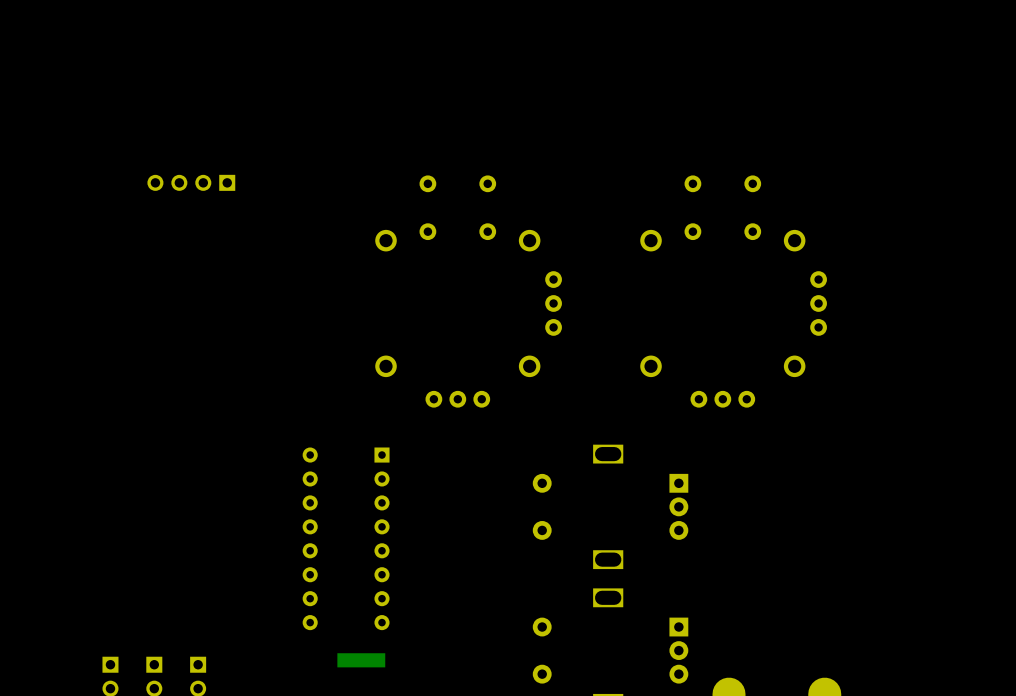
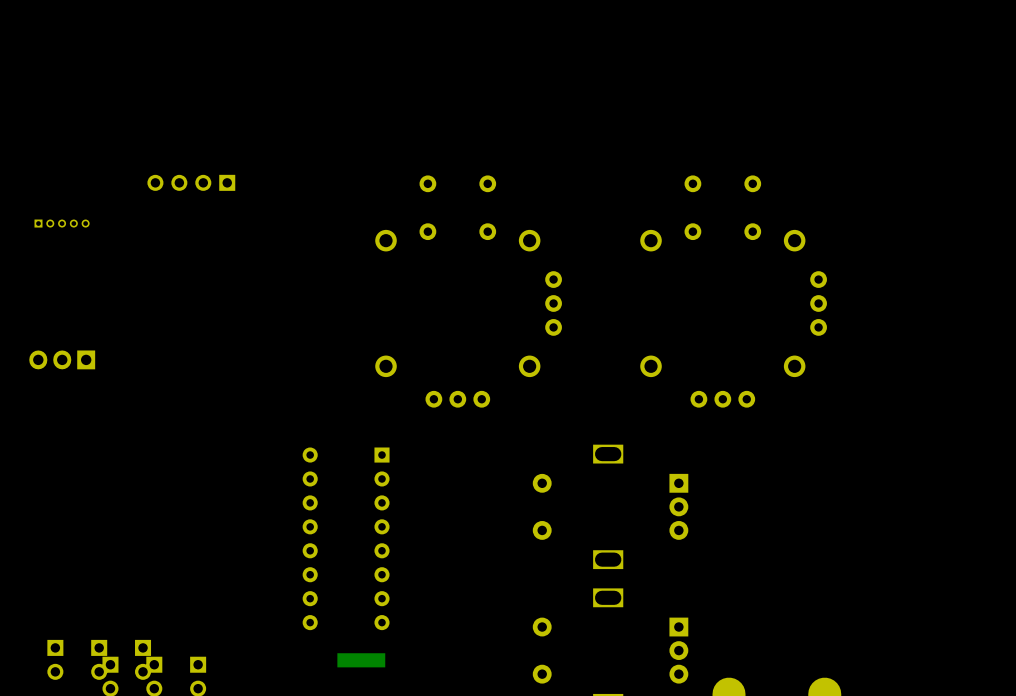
part: none -> (62, 223)
part: none -> (62, 359)
part: none -> (55, 659)
part: none -> (99, 659)
part: none -> (143, 659)

